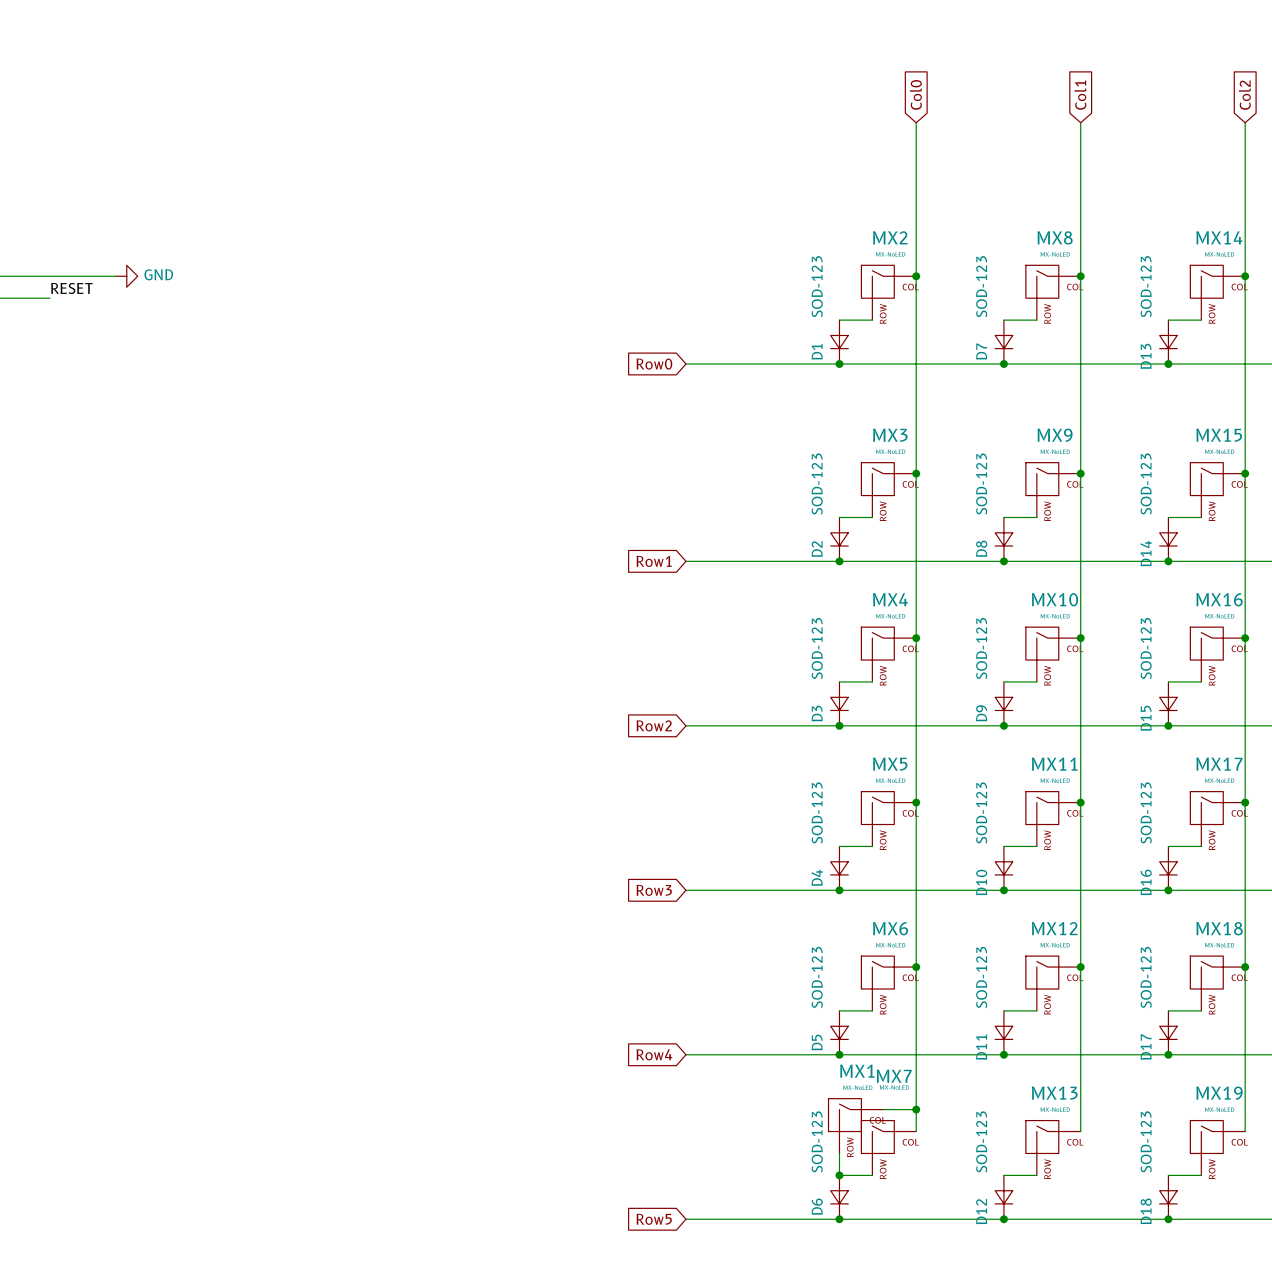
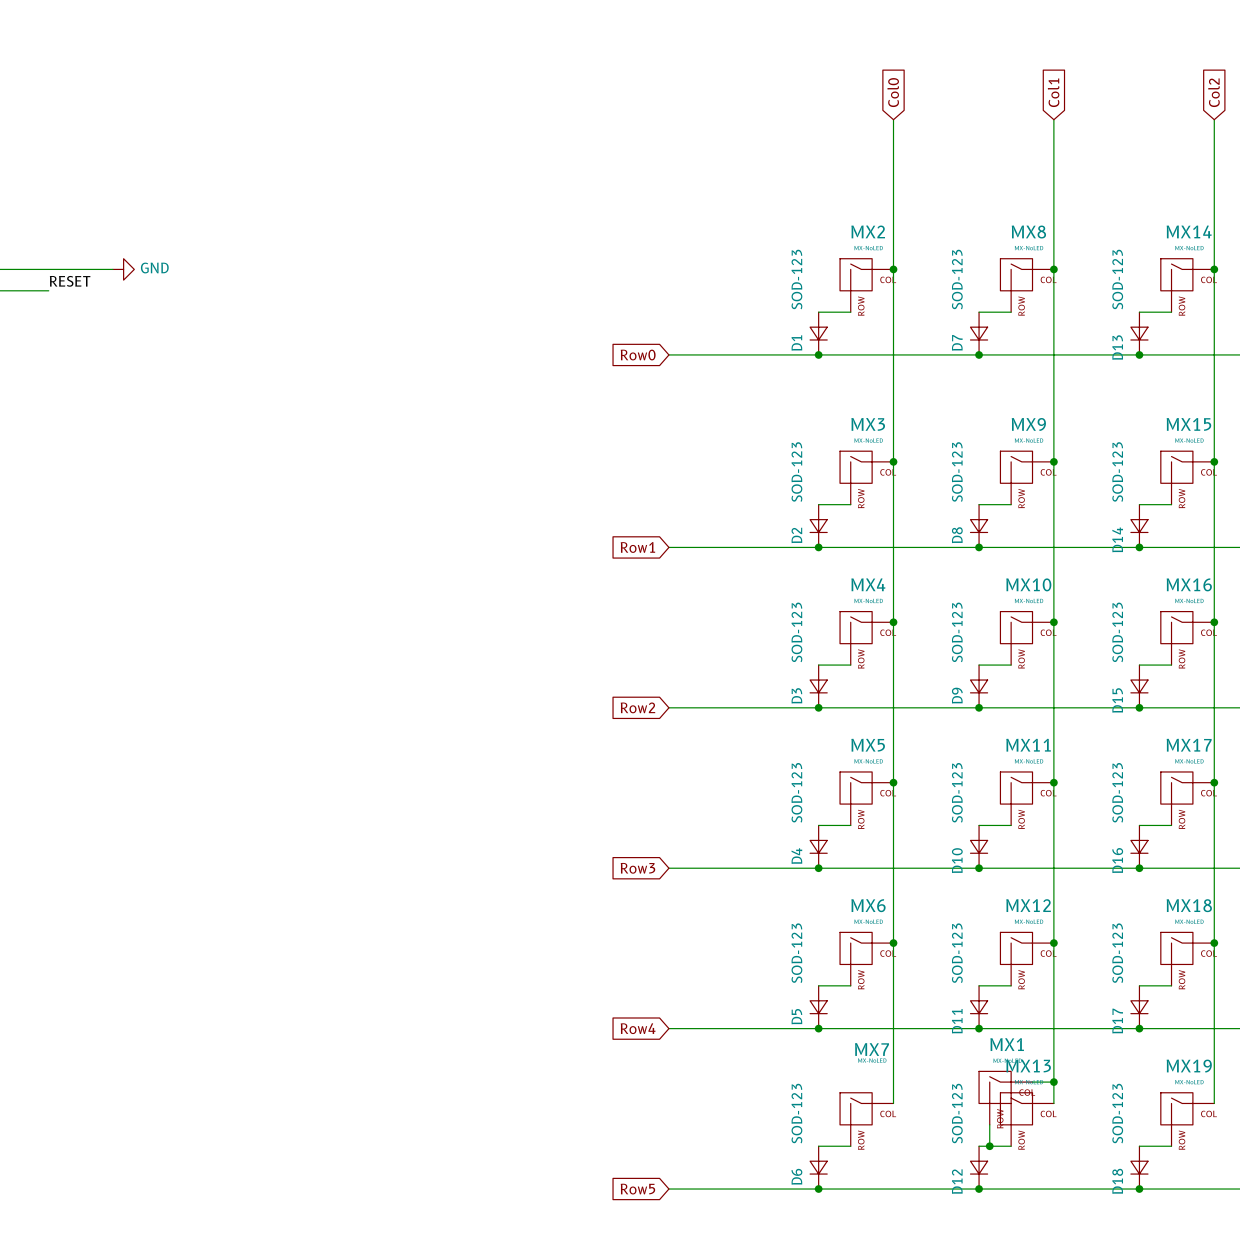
wire: (883, 1109) (916, 1109) -> none
junction: (916, 1109) -> none
wire: none -> (1032, 1082) (1053, 1082)
junction: none -> (1053, 1082)
MX1 position: (855, 1126) -> (1005, 1098)
wire: (839, 1153) (839, 1175) -> (989, 1124) (989, 1146)
junction: (839, 1175) -> none
junction: none -> (989, 1146)

